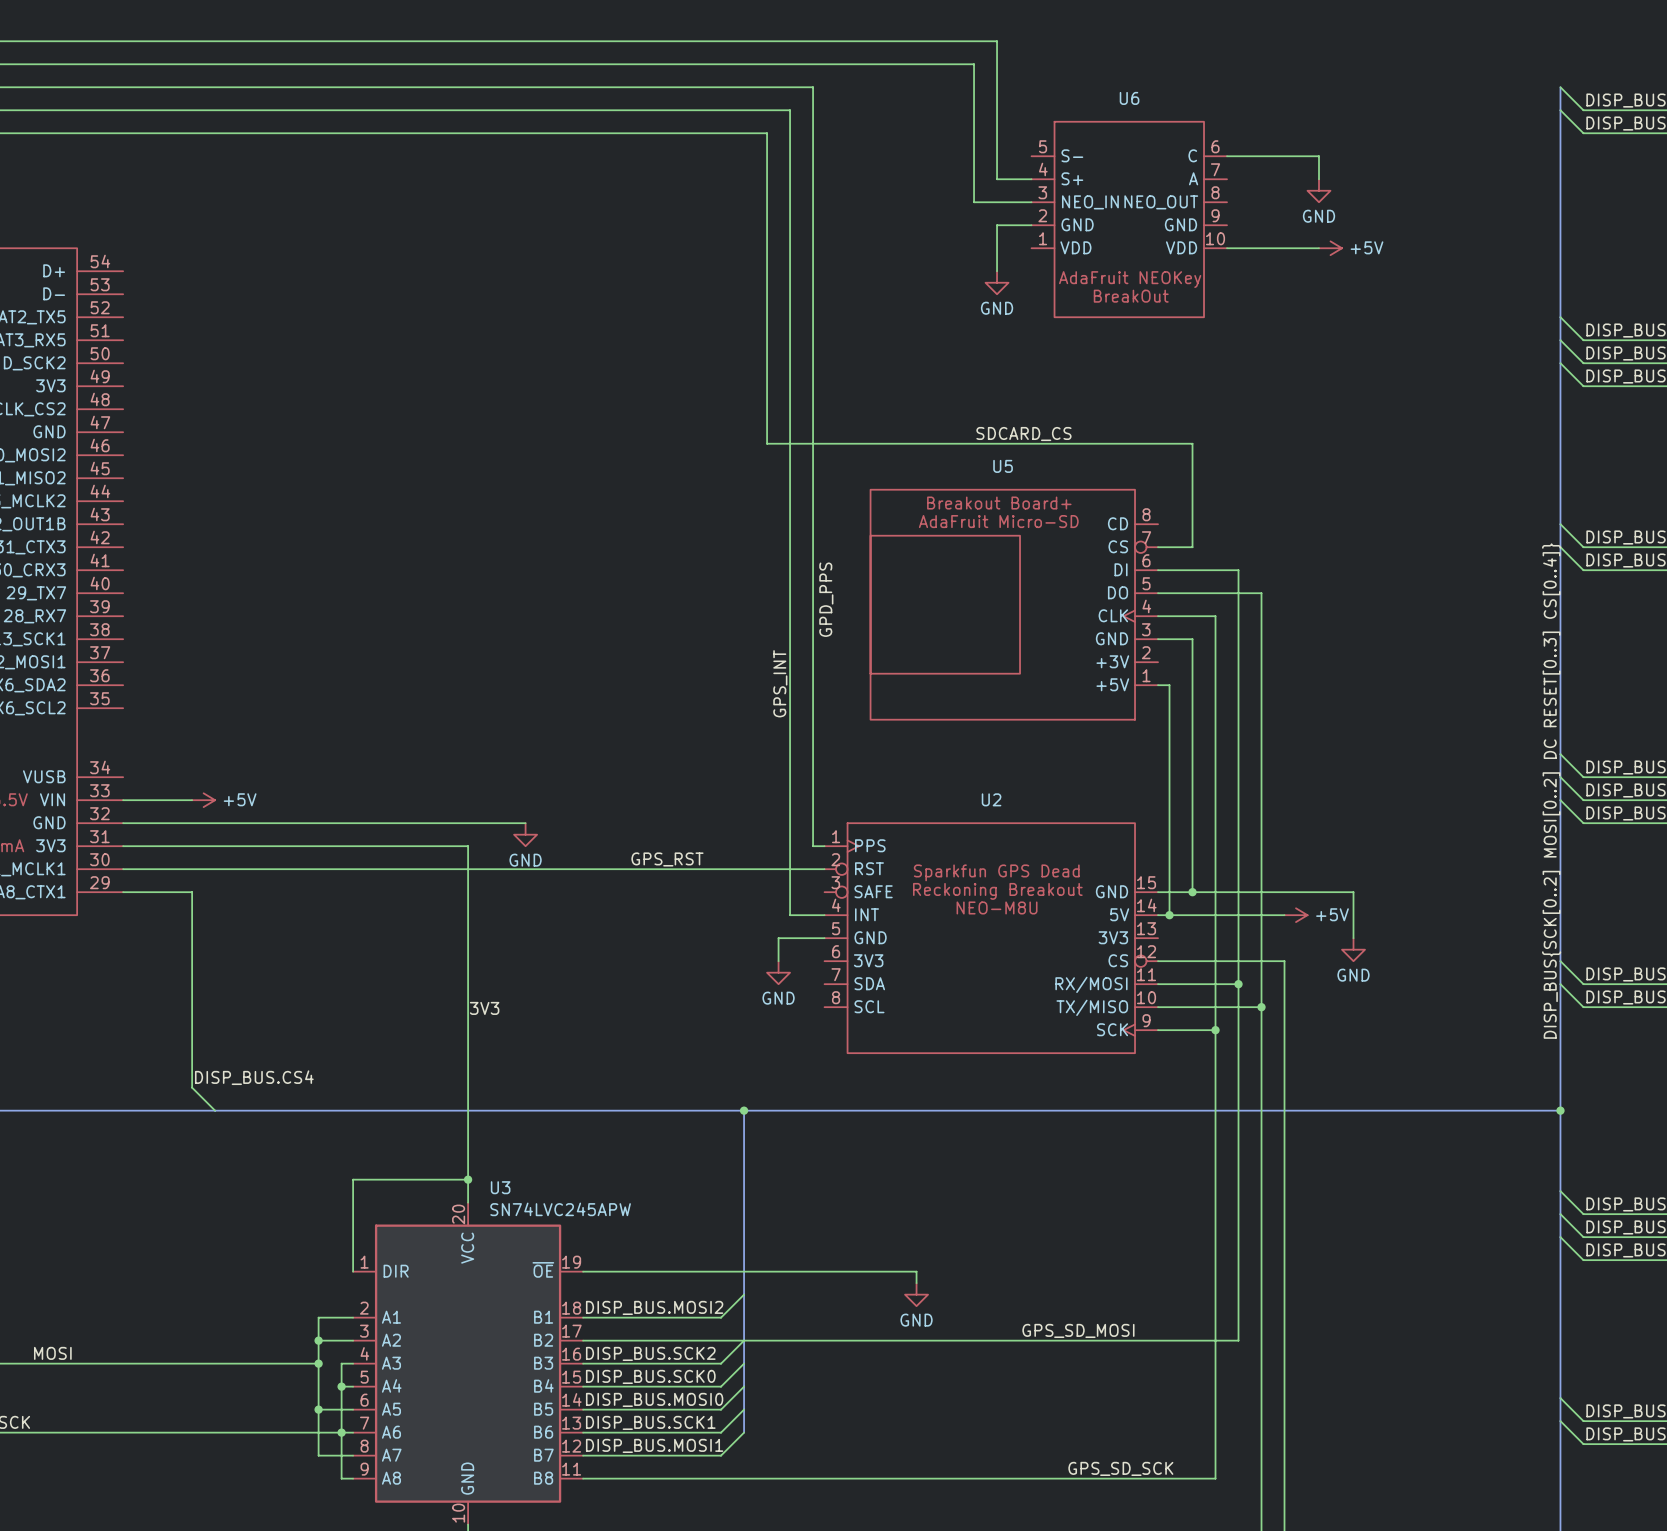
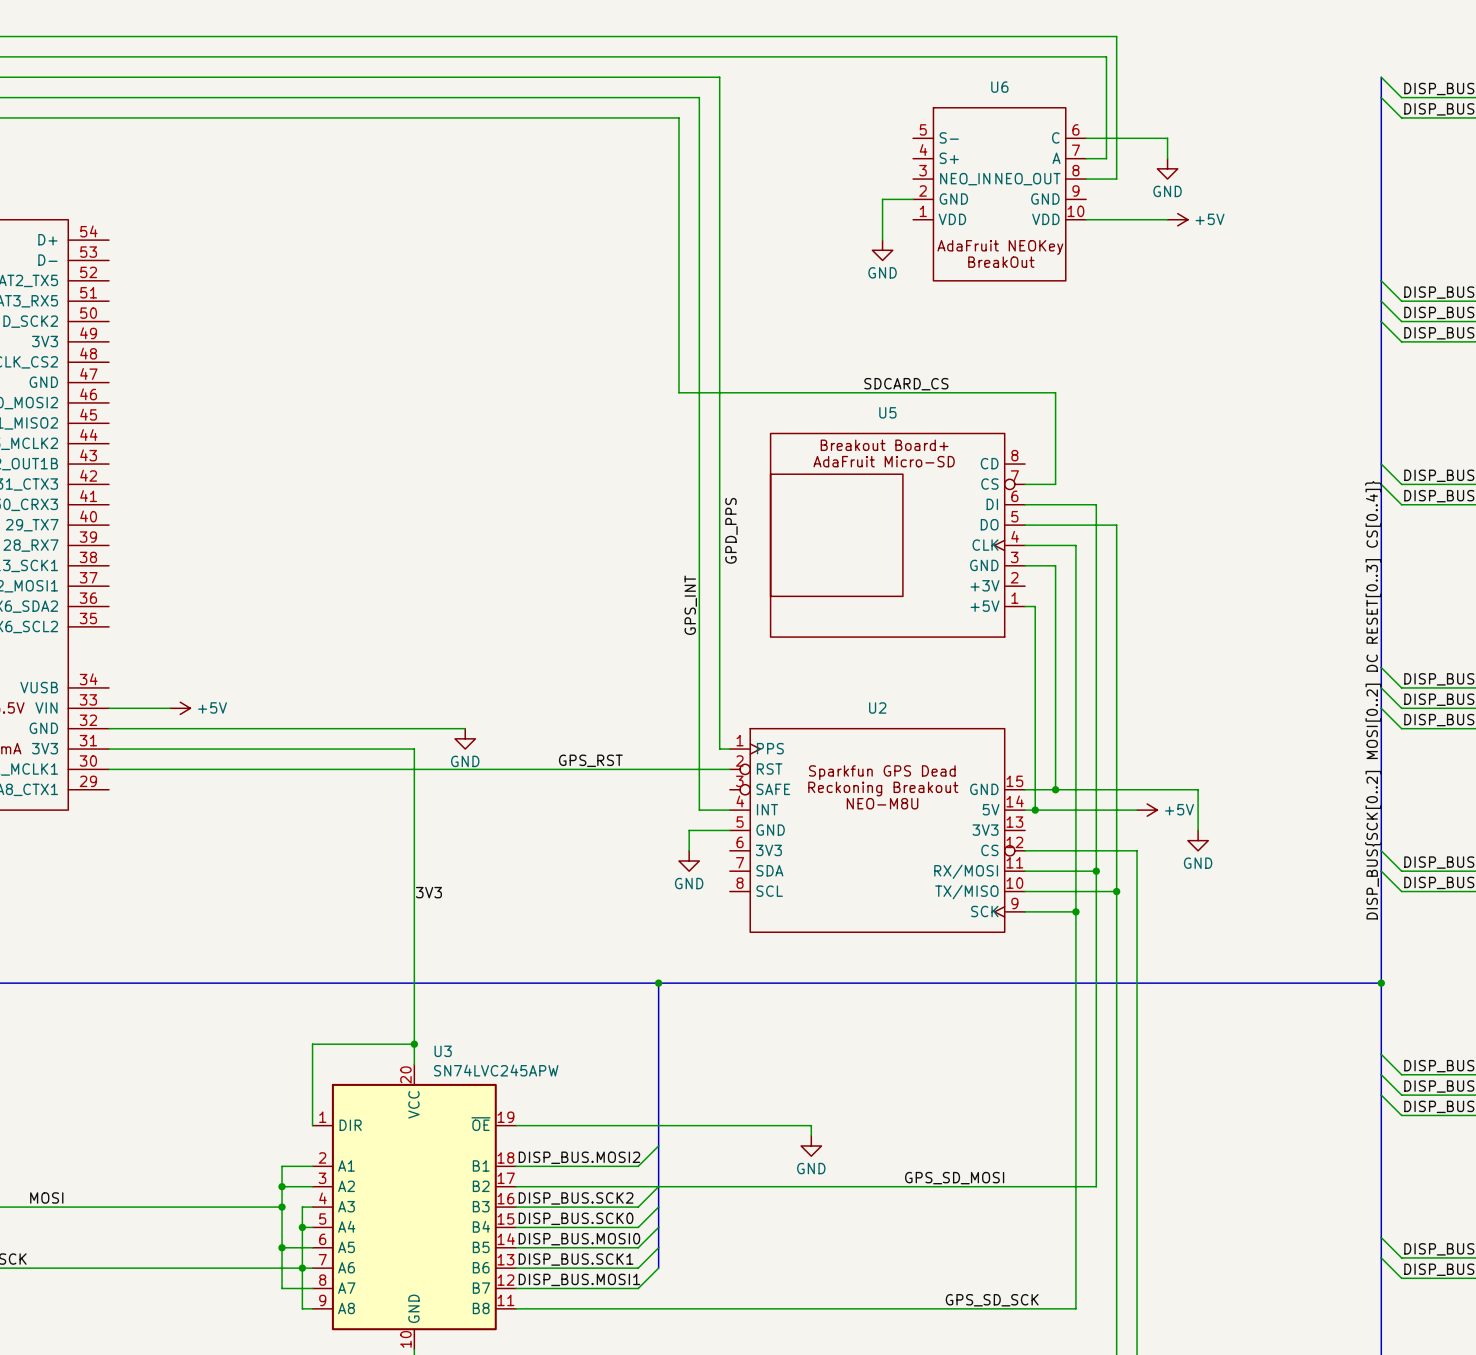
wire: (997, 41) (997, 179) (1031, 179) -> (882, 36) (1116, 36) (1116, 179) (1086, 179)
wire: (974, 64) (974, 202) (1031, 202) -> (862, 56) (1106, 56) (1106, 158) (1086, 158)
wire: (123, 892) (192, 892) (192, 1087) (215, 1110) -> none
label: DISP_BUS.CS4 (254, 1077) -> none

